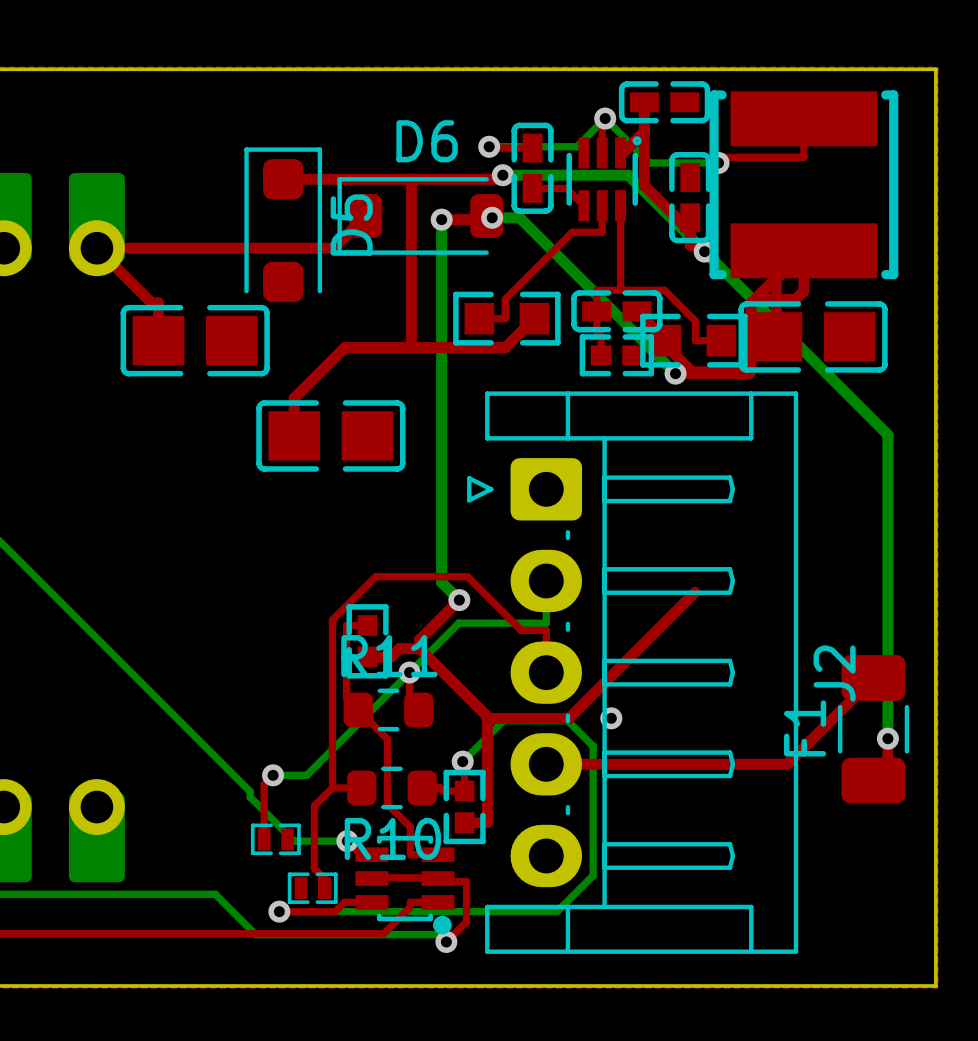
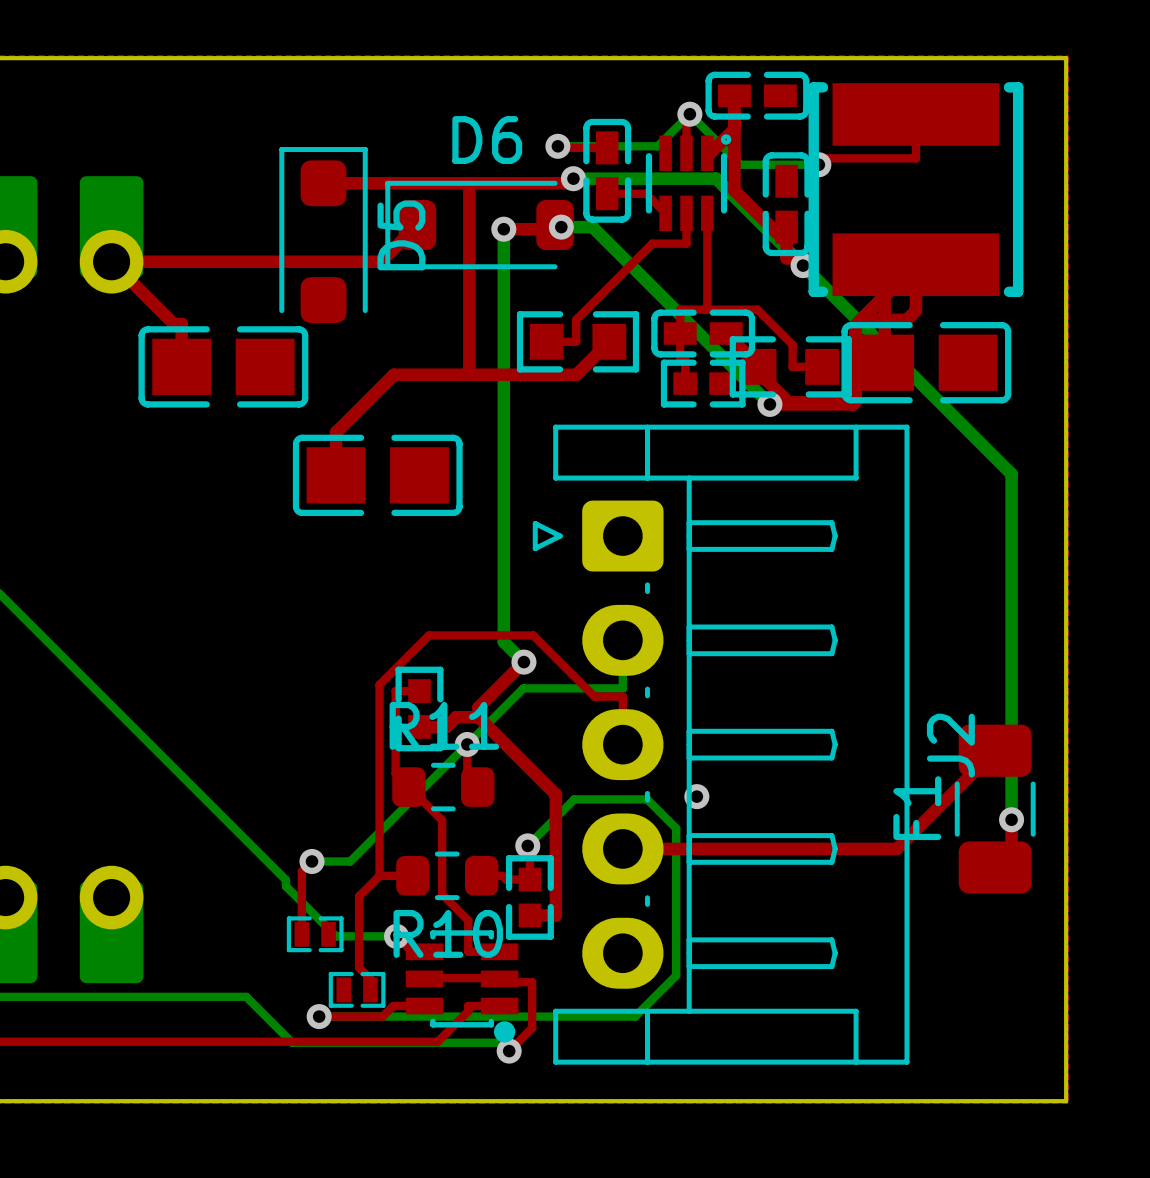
top track: (695, 592) (568, 718) (487, 718) -> none

